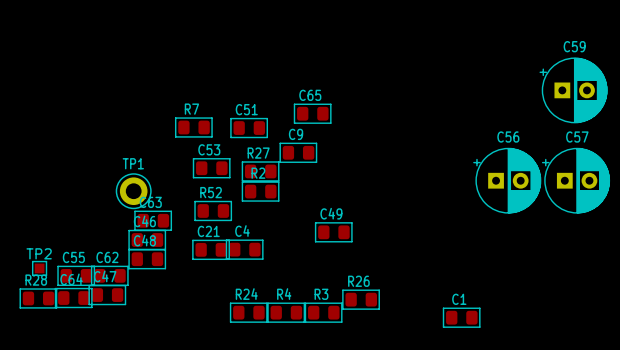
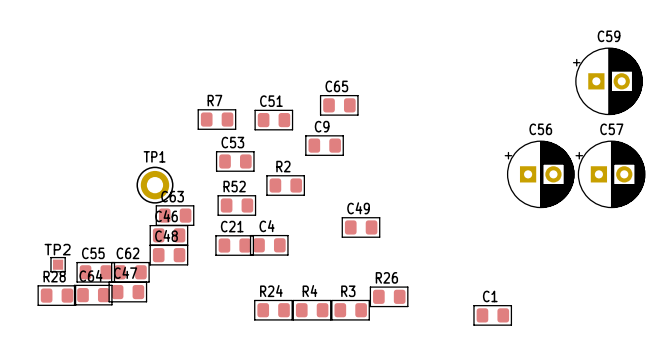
R27: (260, 171) -> none

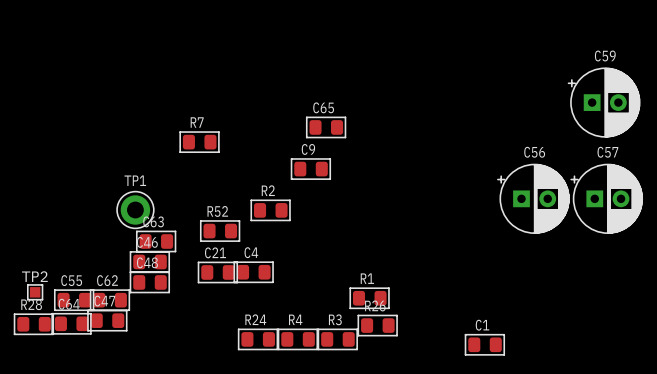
C51: (273, 120) -> none
C53: (235, 161) -> none
C49: (361, 227) -> none
R1: none -> (369, 298)

